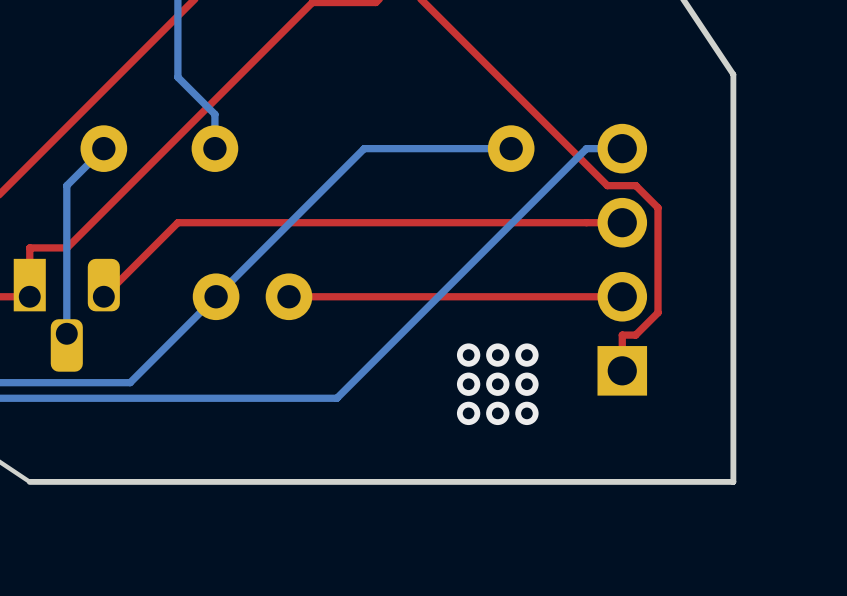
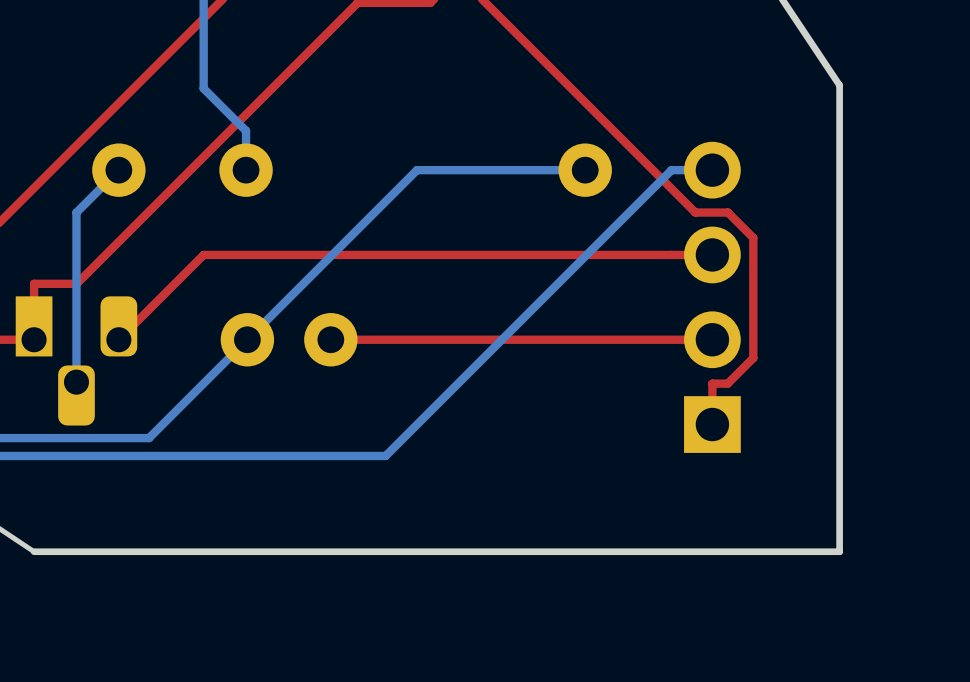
via: (468, 355) -> none
via: (497, 355) -> none
via: (526, 355) -> none
via: (468, 384) -> none
via: (497, 384) -> none
via: (526, 384) -> none
via: (468, 413) -> none
via: (497, 413) -> none
via: (526, 413) -> none

